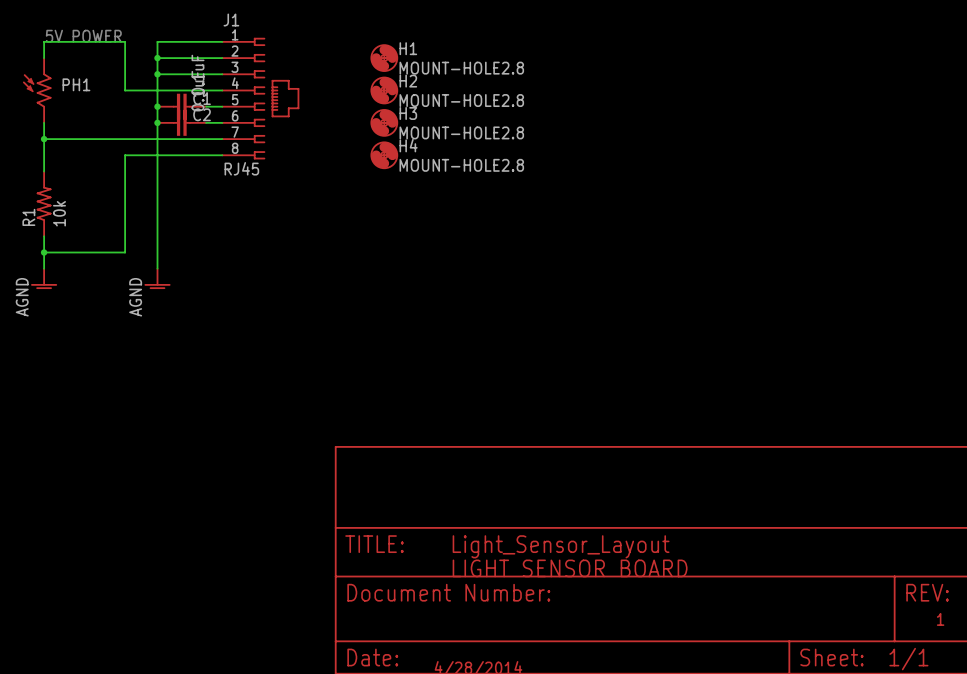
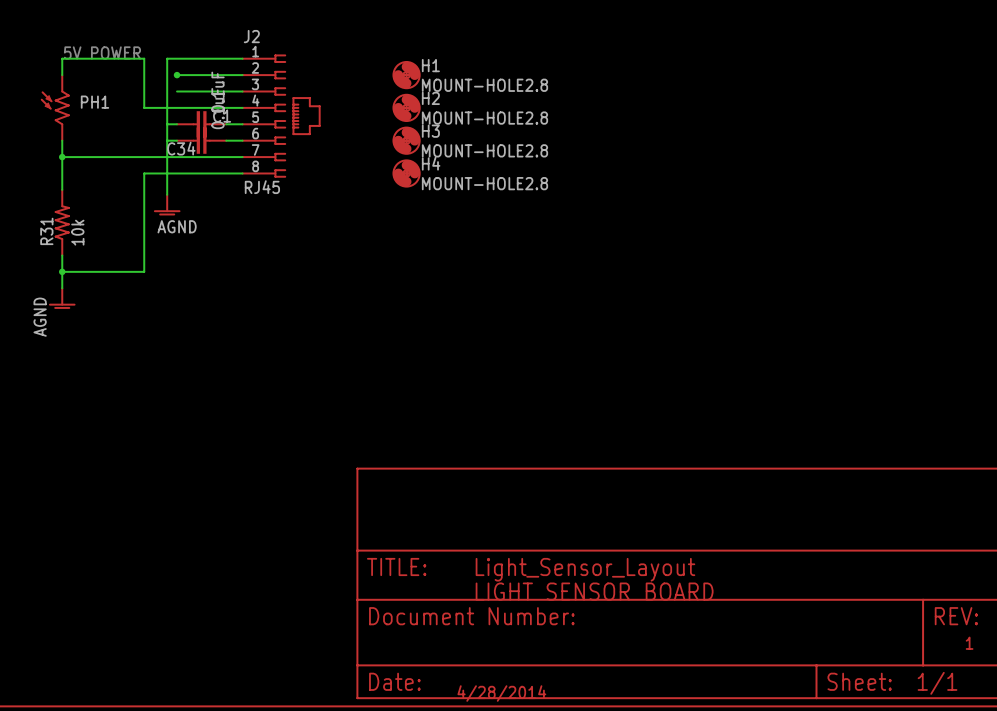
J1 name: J1 (231, 20) -> J2 (251, 36)
wire: (157, 41) (157, 268) -> (177, 58) (167, 58) (167, 194)
junction: (157, 74) -> none
wire: none -> (167, 124) (177, 124)
junction: (157, 106) -> none
C2 name: C2 (202, 114) -> C34 (181, 148)
wire: none -> (167, 140) (177, 140)
junction: (157, 122) -> none
R1 name: R1 (28, 217) -> R31 (46, 231)
power symbol position: AGND (157, 278) -> AGND (167, 205)
power symbol text rotation: 0° (135, 297) -> 90° clockwise (177, 226)

